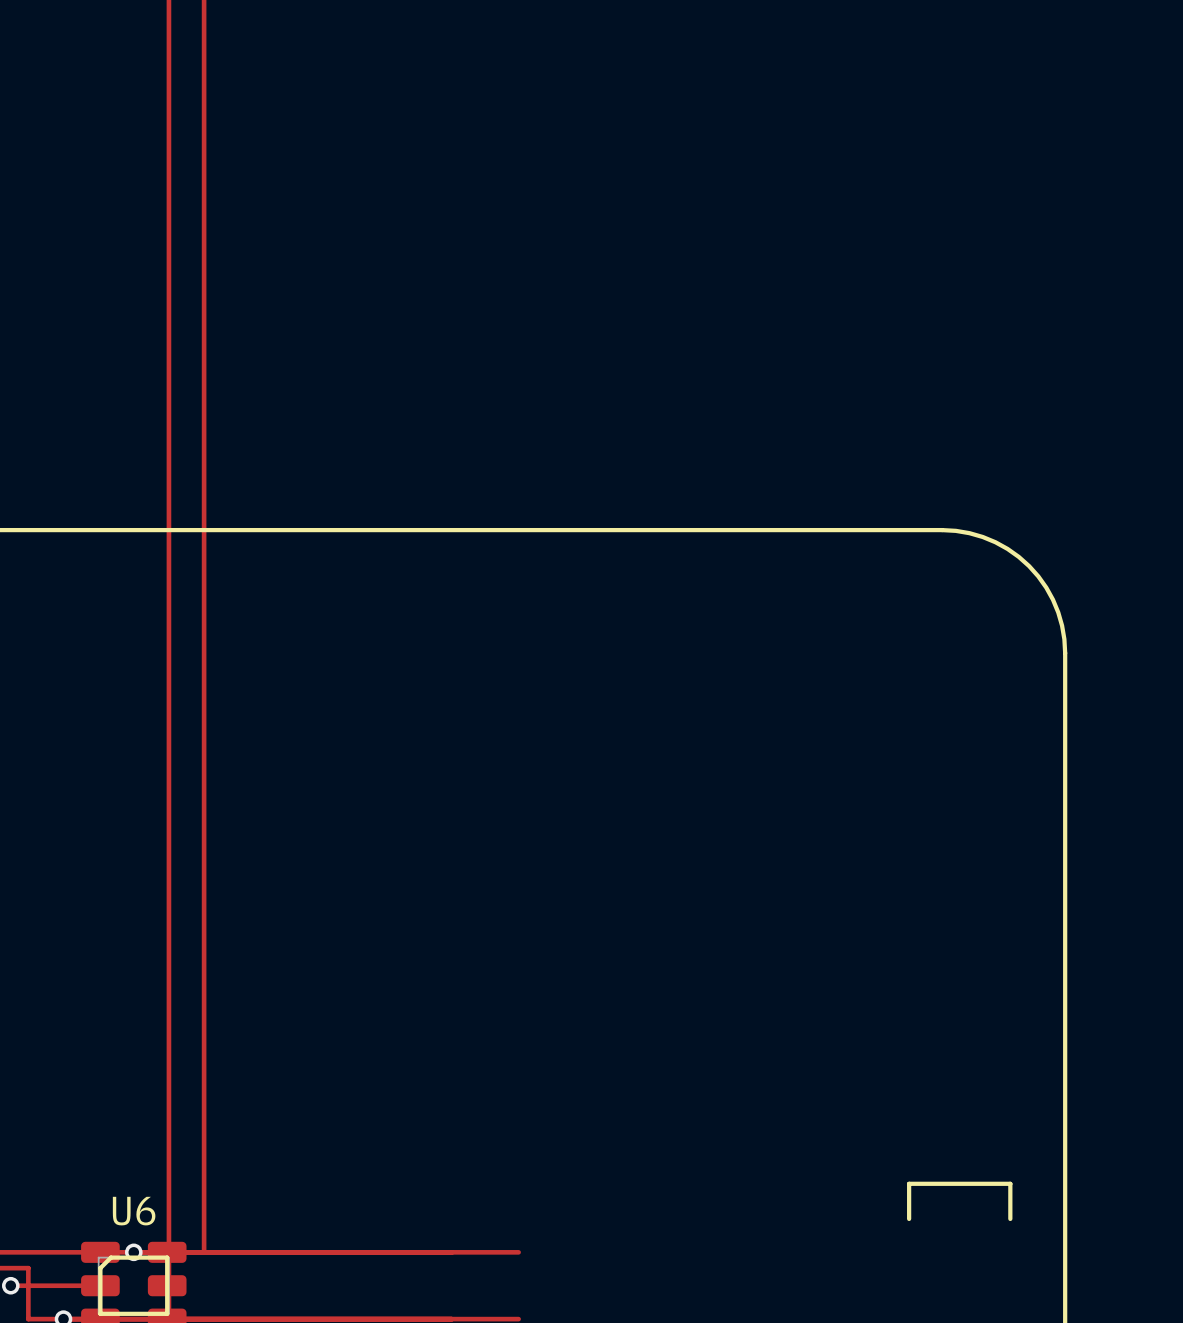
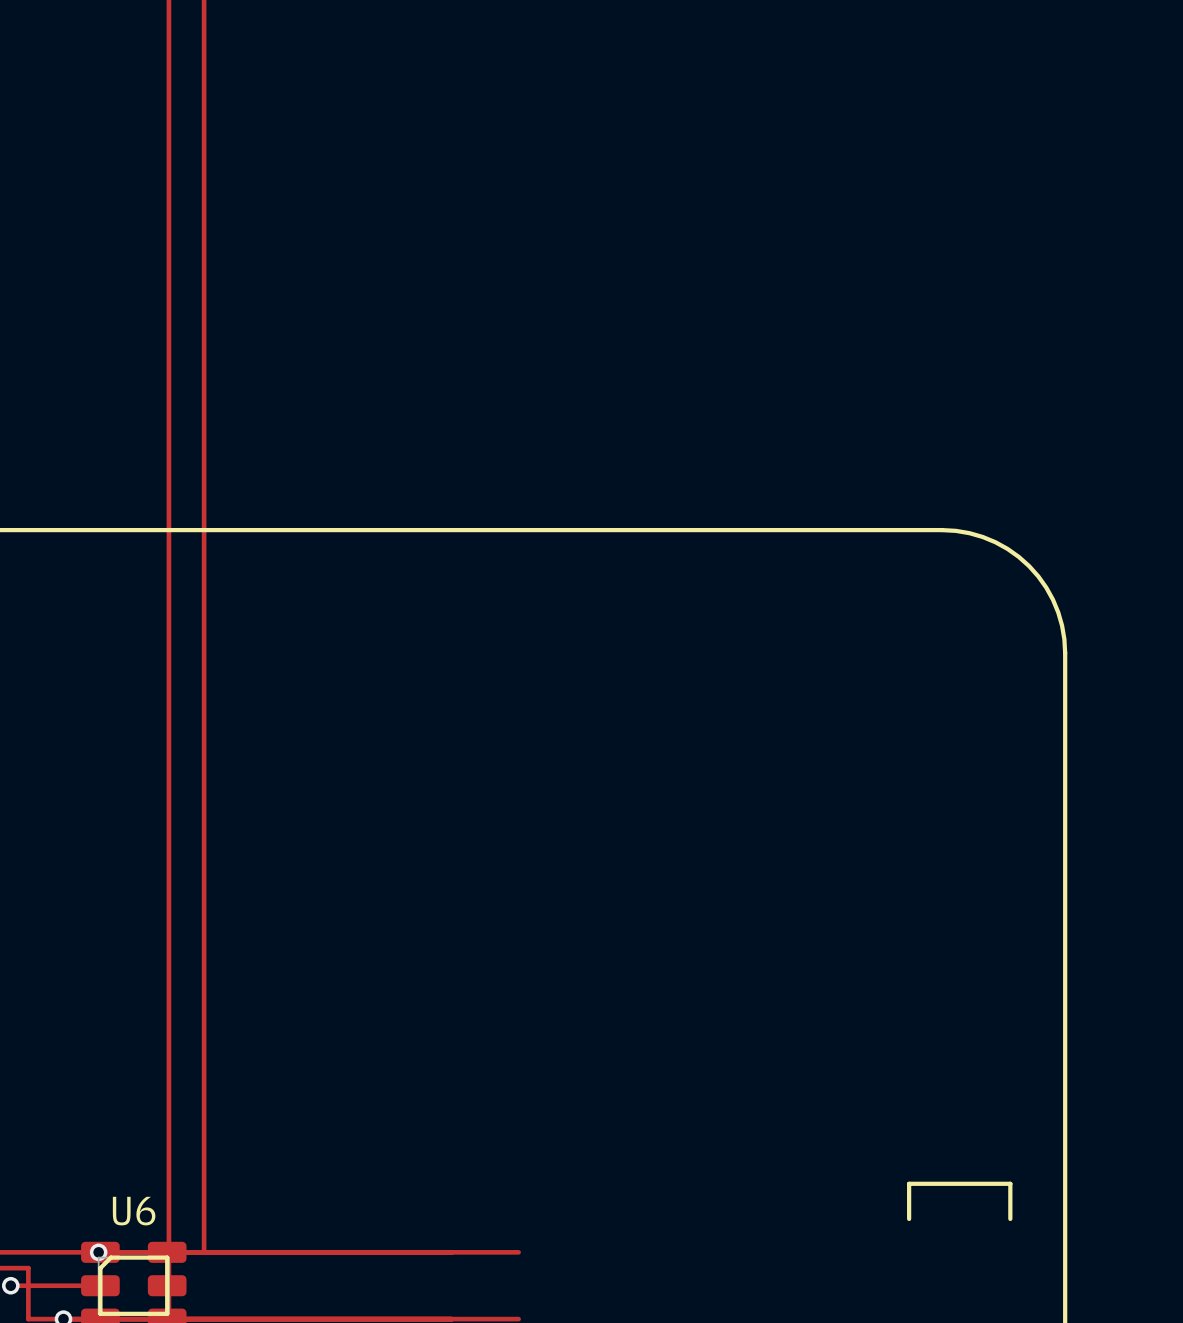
via position: (133, 1252) -> (98, 1252)

